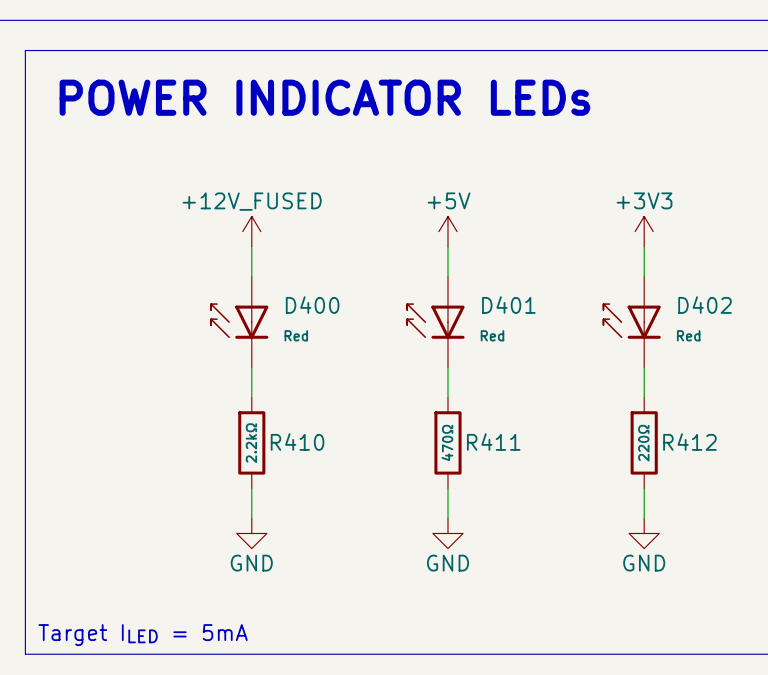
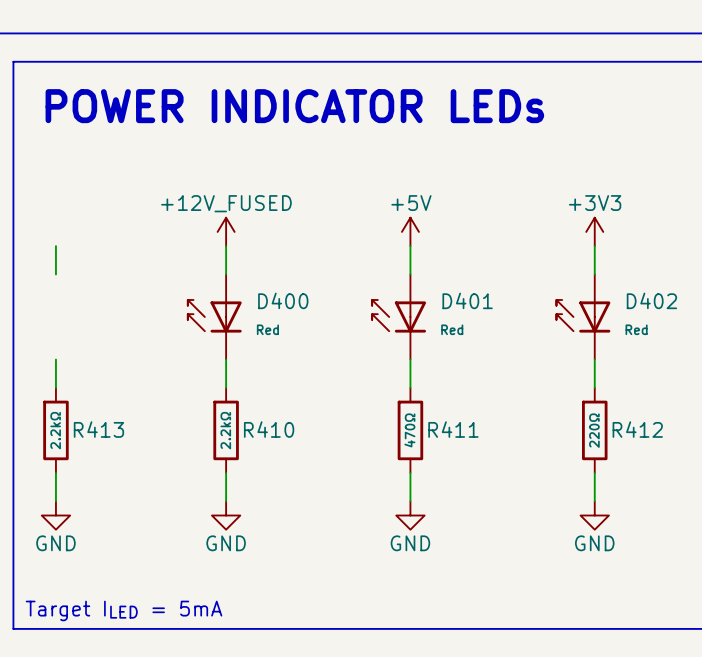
wire: none -> (55, 246) (55, 274)
wire: none -> (55, 359) (55, 387)
R413: none -> 2.2kΩ (55, 430)
wire: none -> (55, 472) (55, 501)
power symbol: none -> GND (55, 515)

